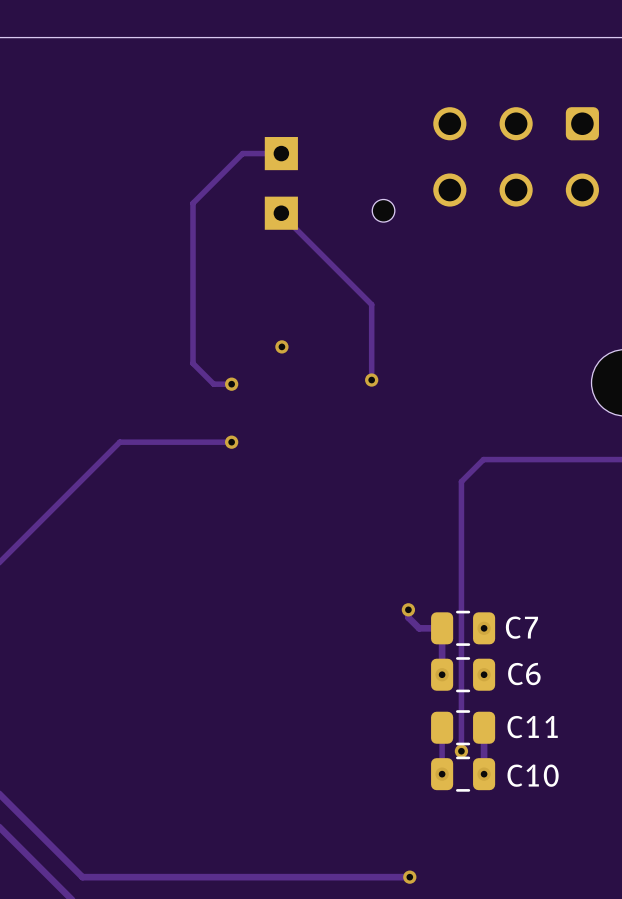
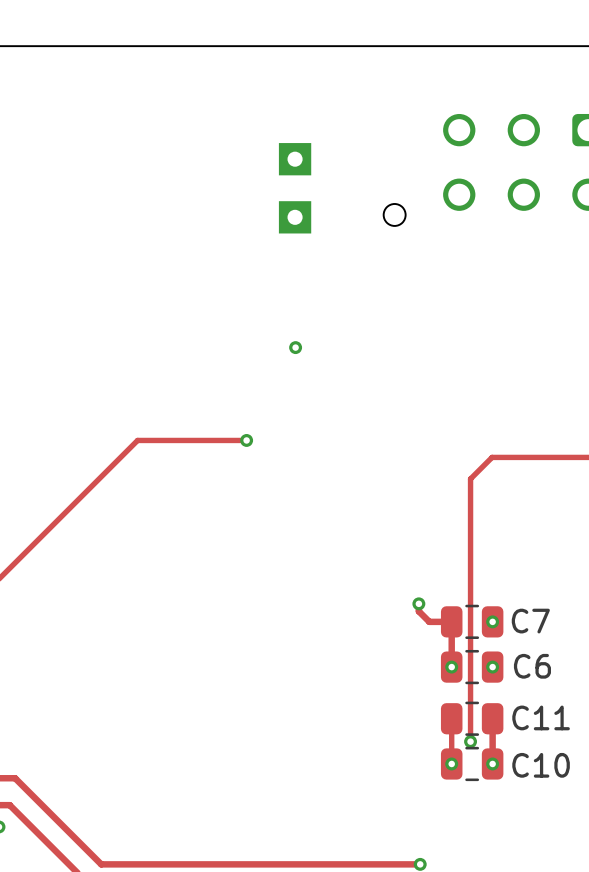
track: (281, 153) (242, 153) (192, 203) (192, 363) (213, 384) (231, 384) -> none
track: (281, 213) (371, 304) (371, 380) -> none
via: (371, 380) -> none
via: (231, 384) -> none

